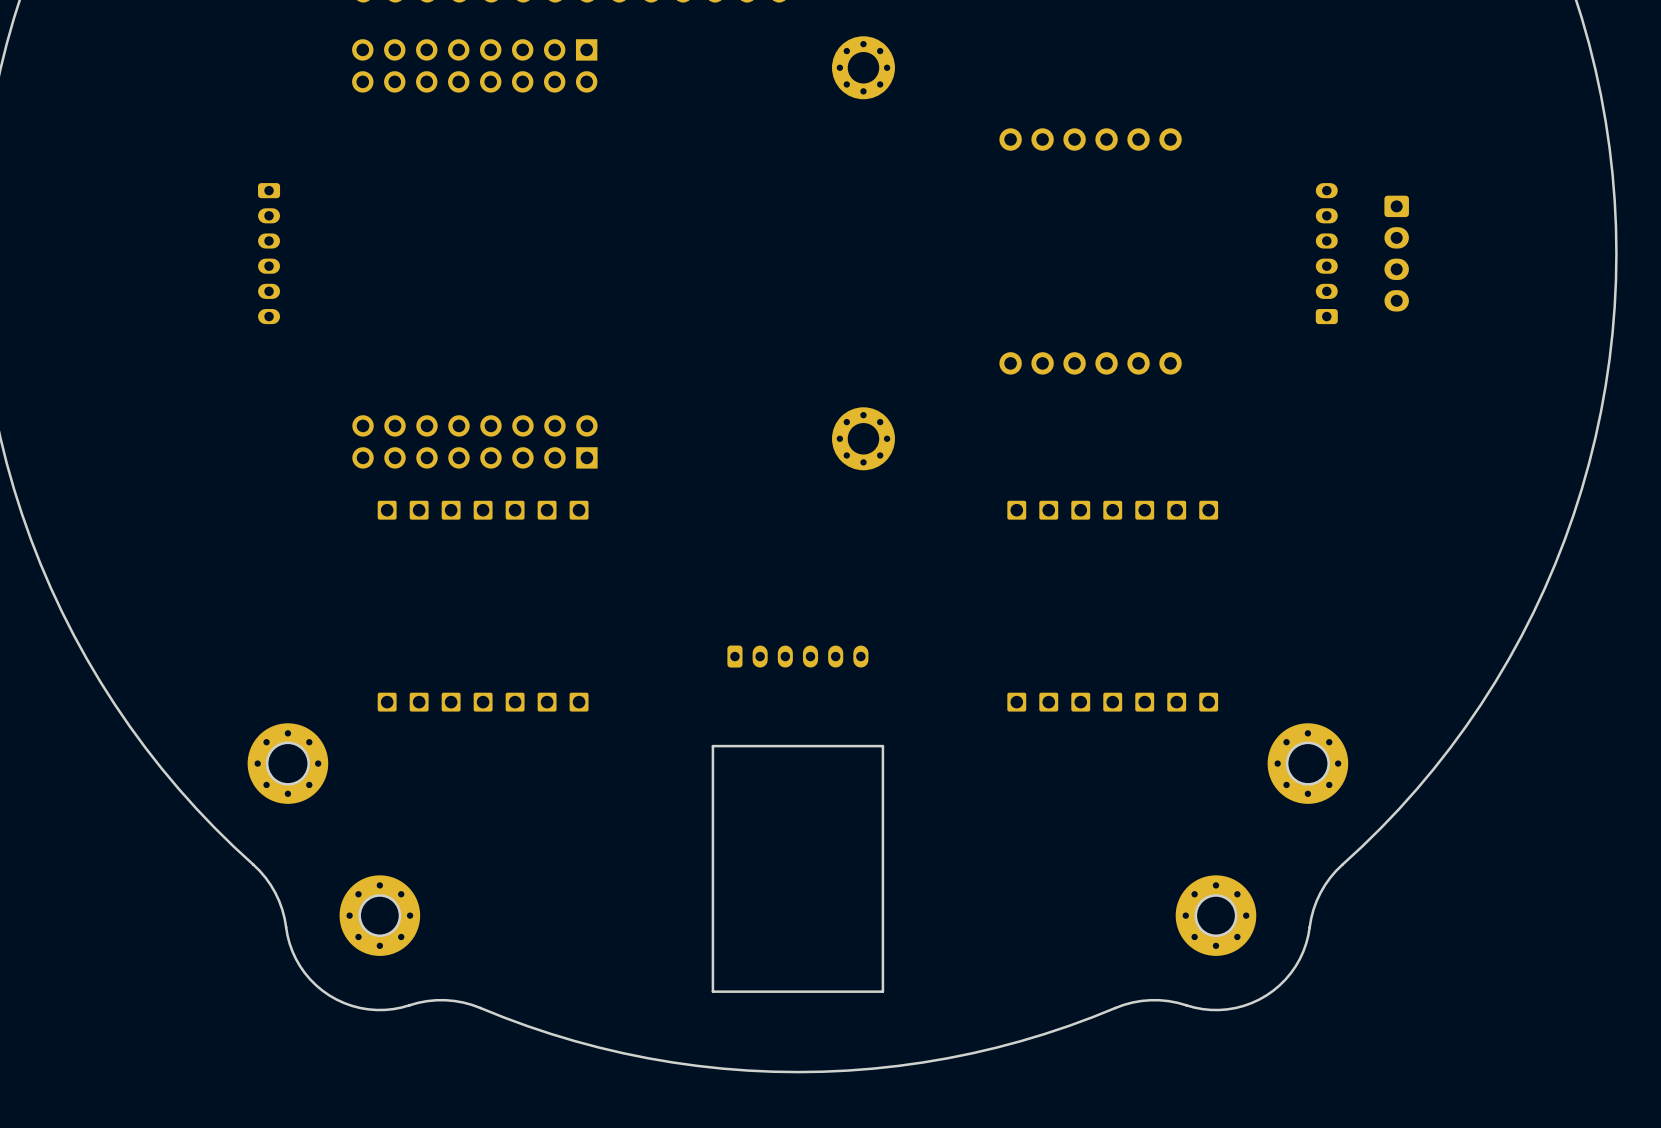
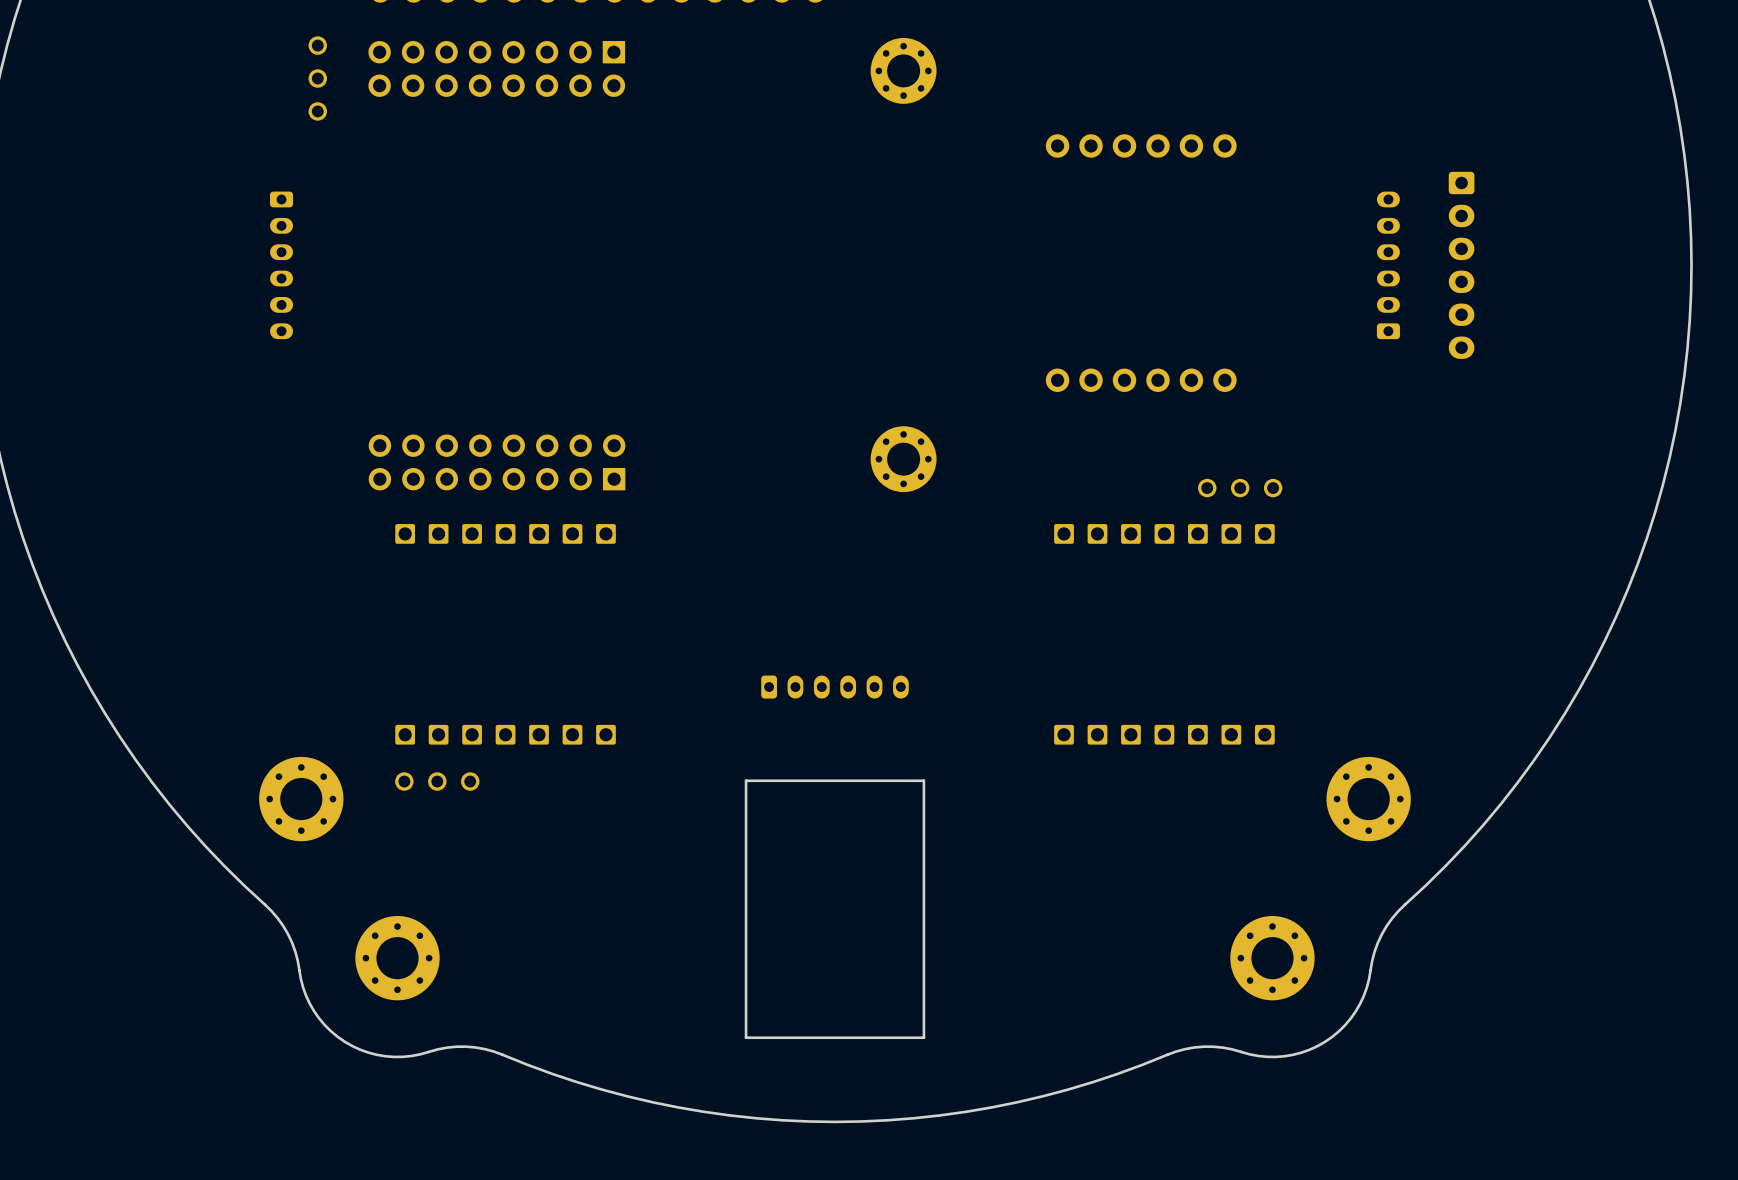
part: none -> (317, 78)
part footprint: [1384, 195, 1409, 312] -> [1448, 171, 1475, 359]
part: none -> (1240, 488)
round board edge: [265, 741, 310, 786] -> none
round board edge: [1285, 741, 1330, 786] -> none
part: none -> (437, 781)
round board edge: [358, 894, 402, 938] -> none
round board edge: [1194, 894, 1238, 938] -> none

